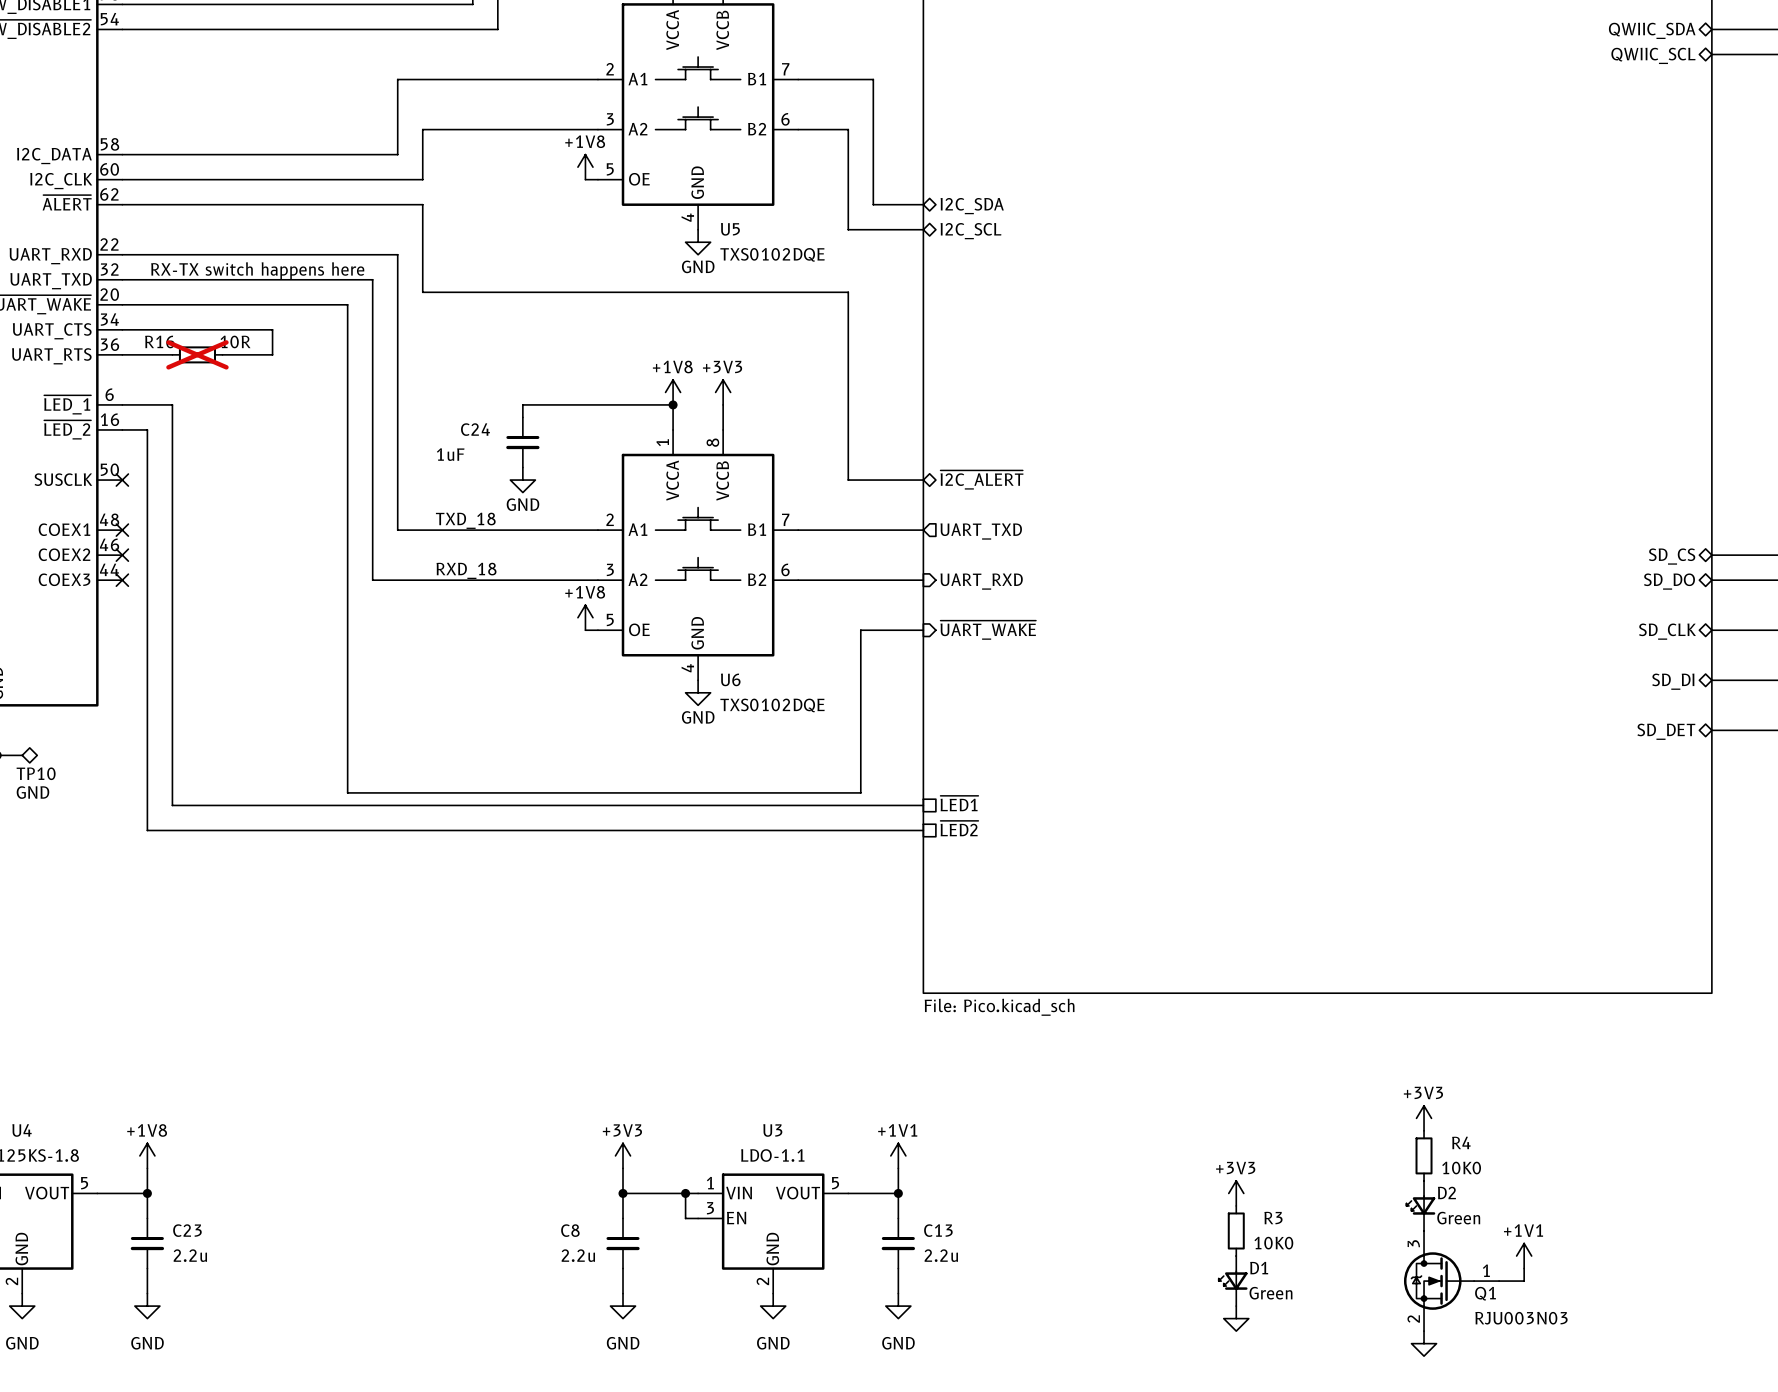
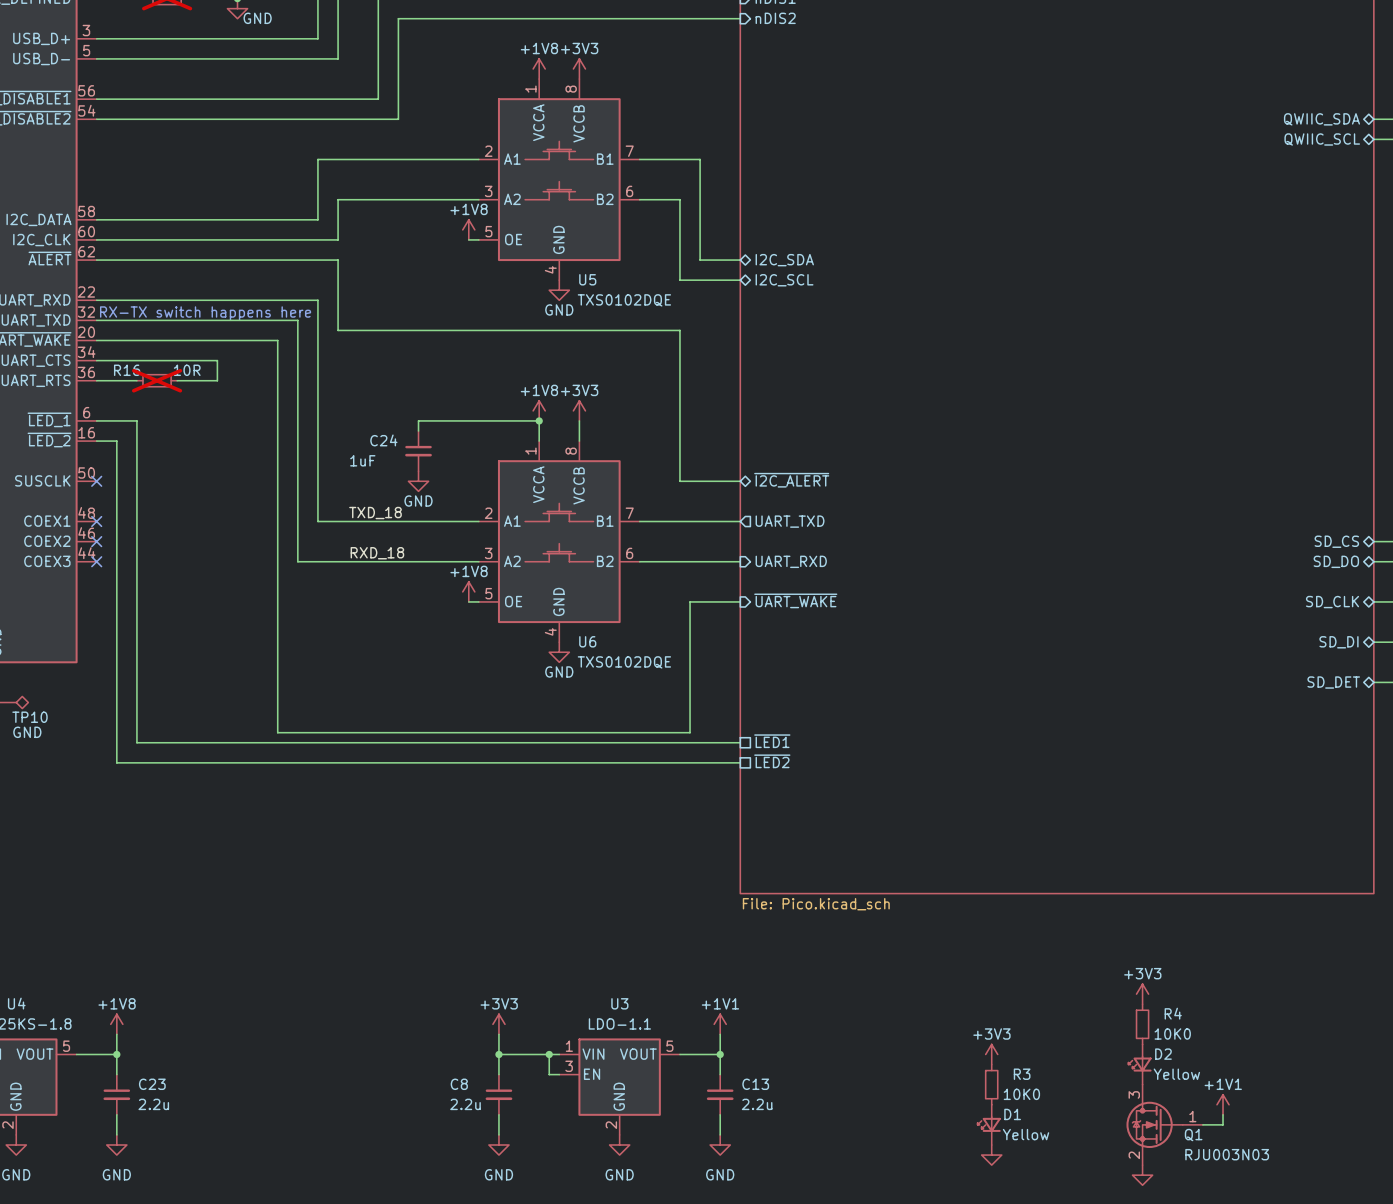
D2 value: Green (1458, 1218) -> Yellow (1176, 1074)
D1 value: Green (1270, 1293) -> Yellow (1026, 1134)

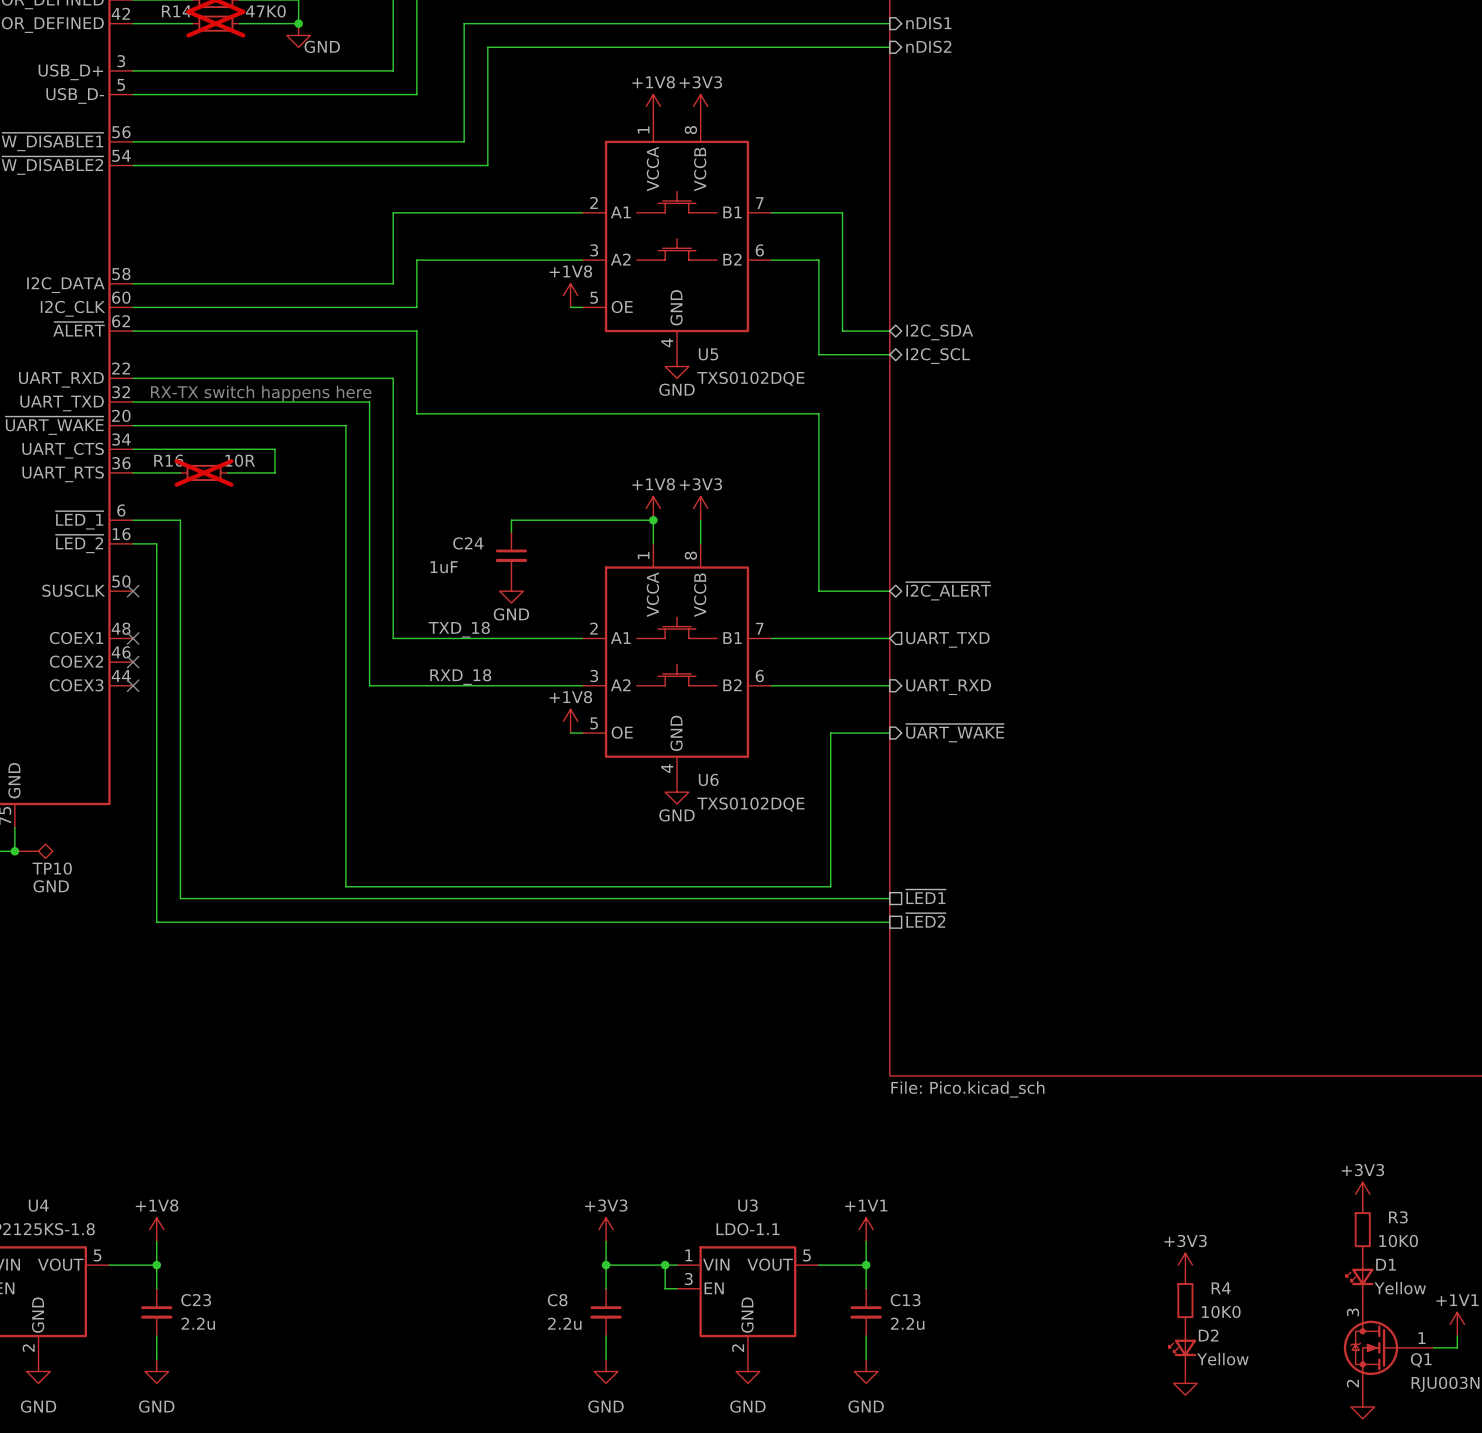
R4 name: R4 (1173, 1013) -> R3 (1398, 1217)
D2 name: D2 (1163, 1054) -> D1 (1386, 1264)
R3 name: R3 (1022, 1074) -> R4 (1221, 1288)
D1 name: D1 (1012, 1114) -> D2 (1208, 1335)

